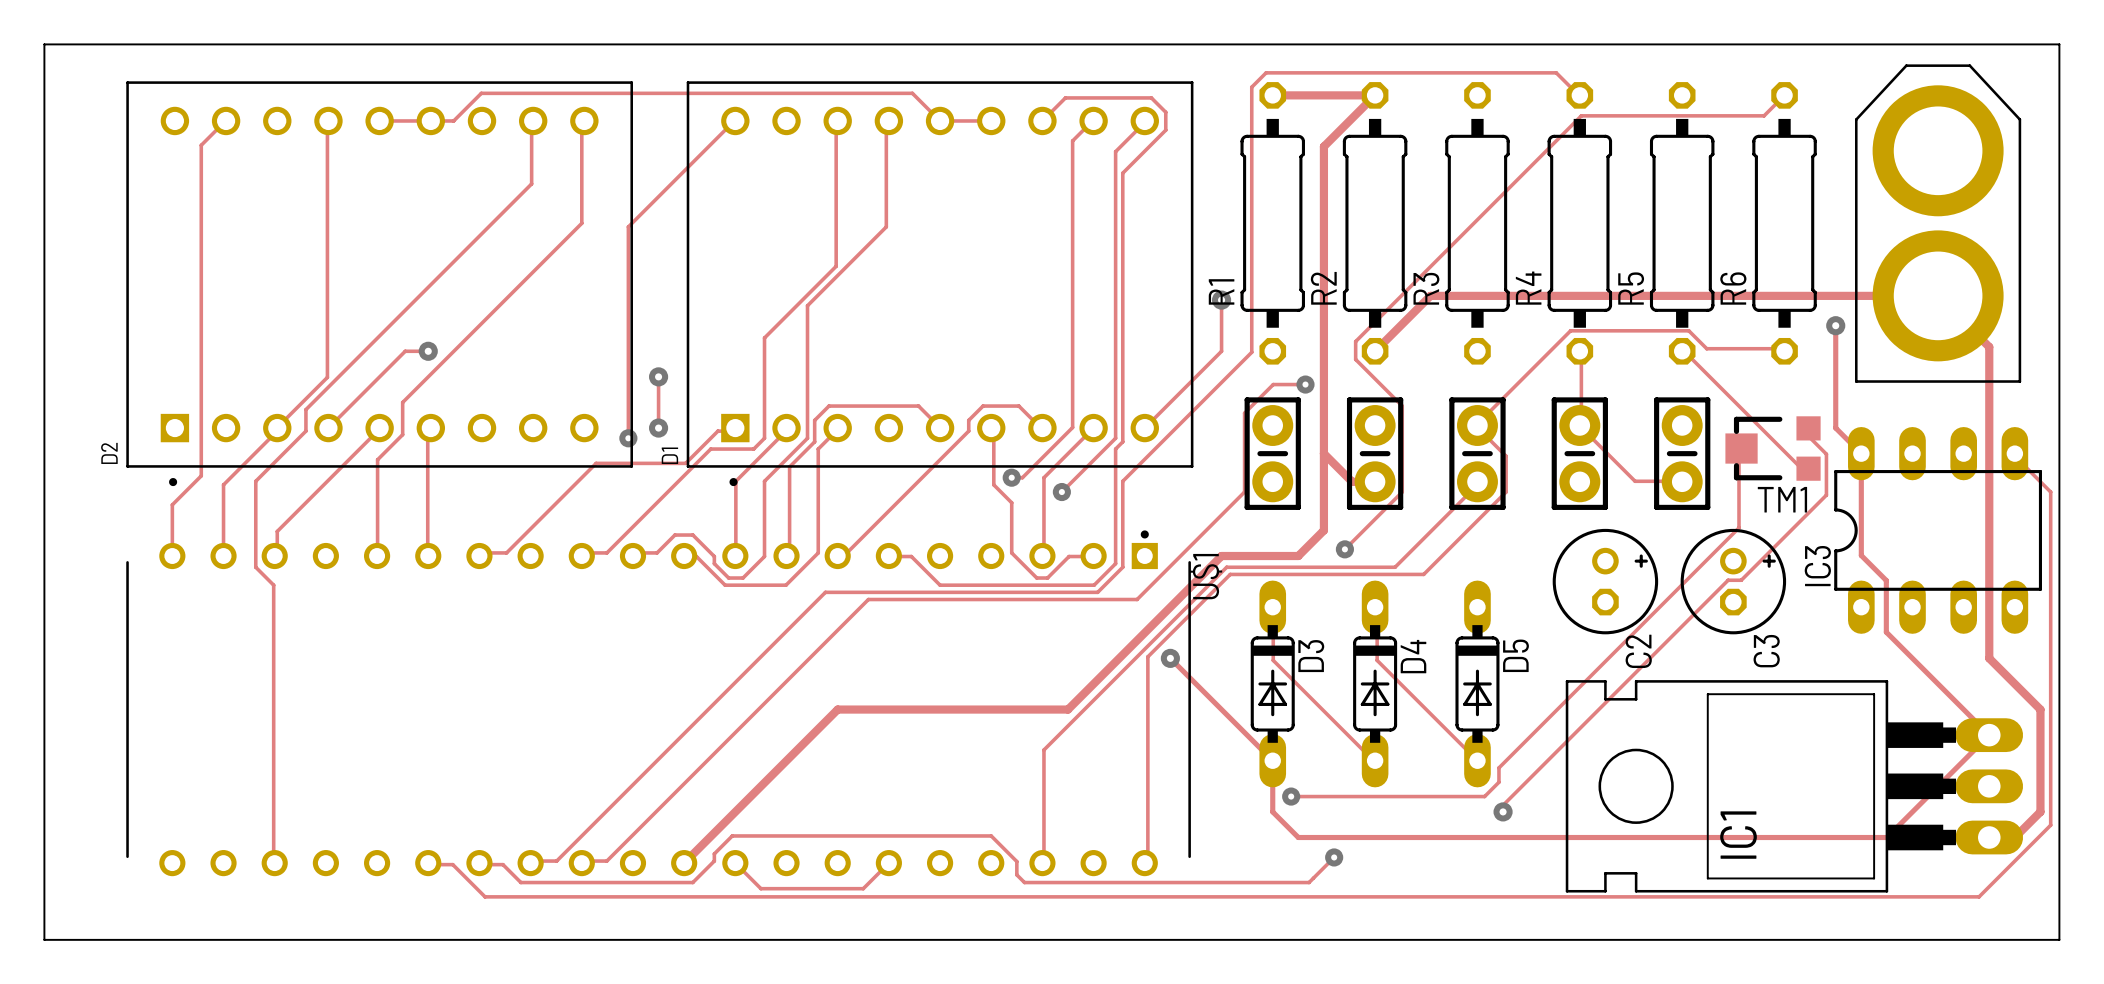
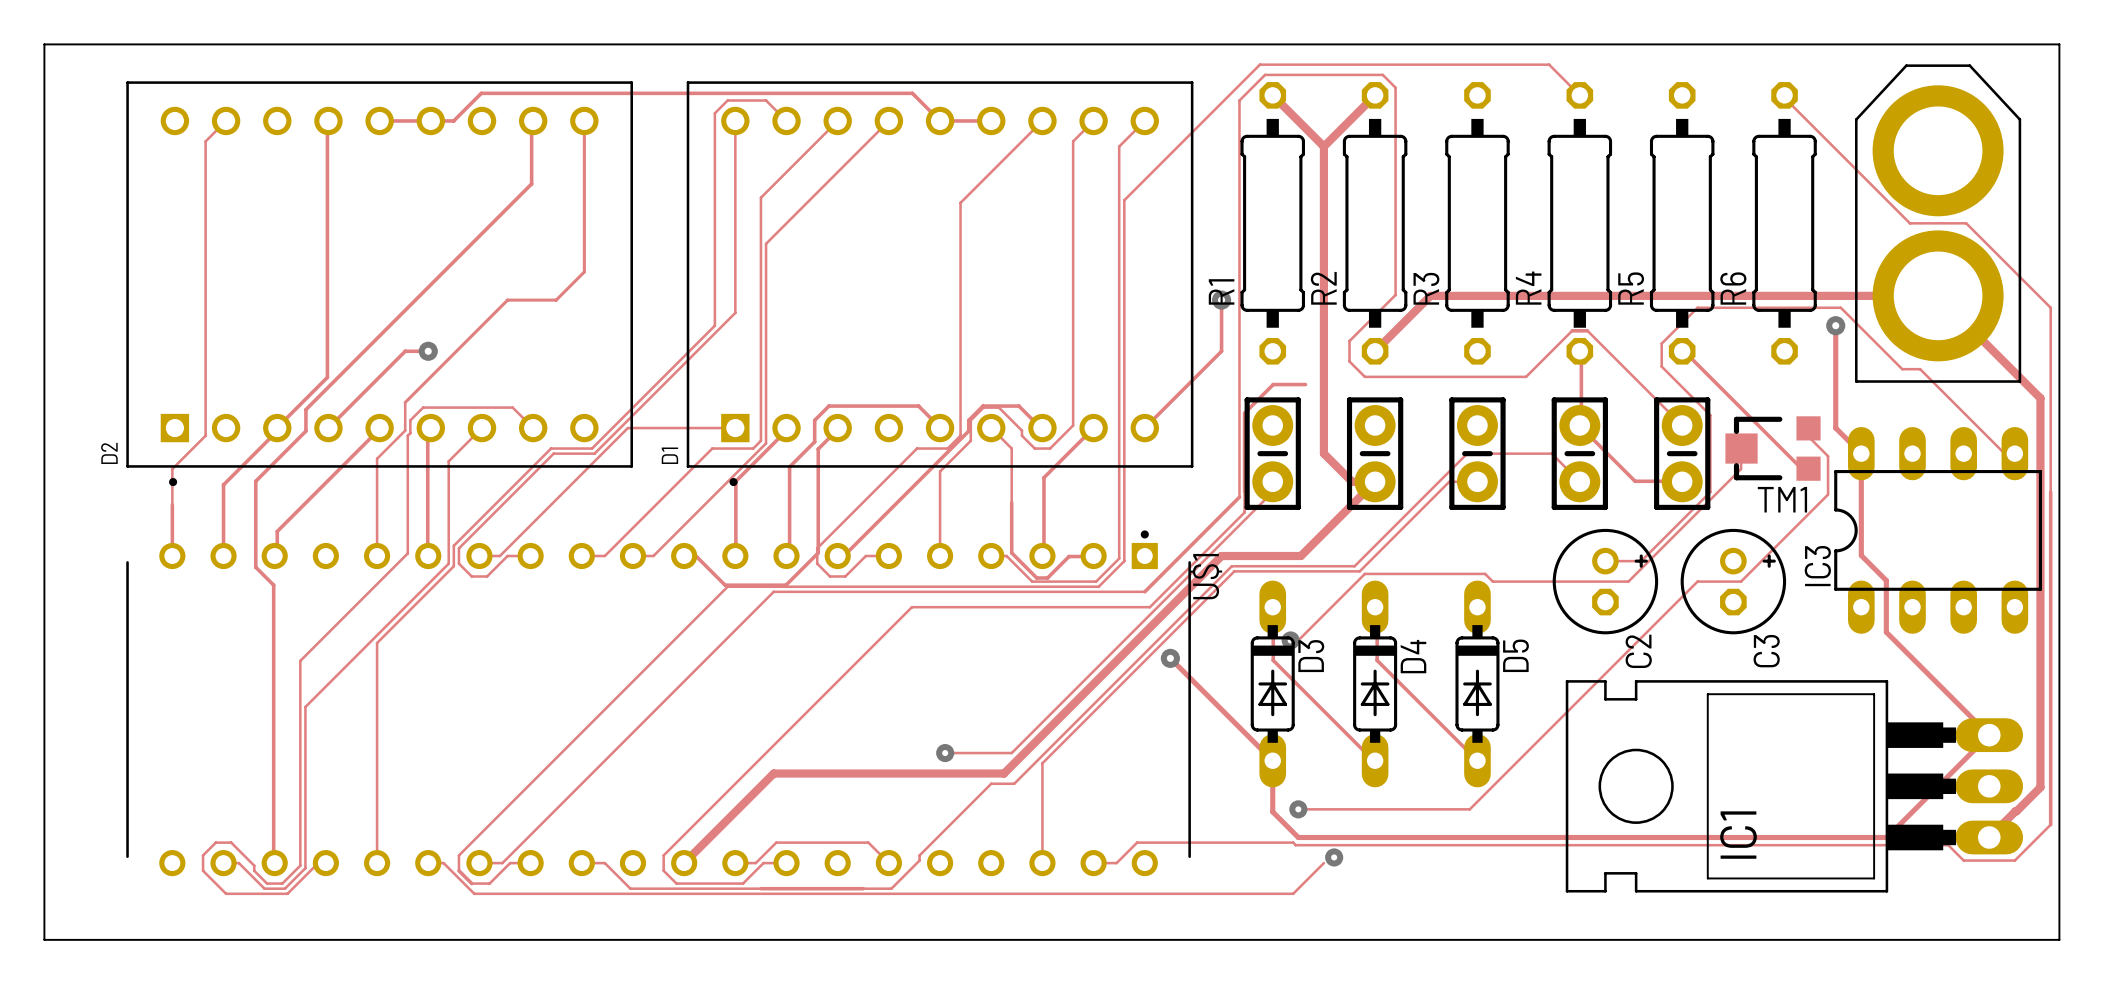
track: (1272, 95) (1375, 95) -> (1272, 95) (1323, 146)
track: (1579, 95) (1556, 72) (1266, 72) (1251, 87) (1251, 352) (1122, 481) (1122, 567) (1097, 592) (825, 592) (556, 861) (531, 861) (530, 863) -> (1579, 95) (1549, 64) (1259, 64) (1124, 200) (1124, 561) (1098, 586) (727, 586) (458, 855) (458, 870)
track: (1784, 95) (1764, 115) (1581, 115) (1355, 341) (1355, 359) (1402, 406) (1402, 492) (1344, 549) -> none
track: (226, 120) (201, 145) (201, 475) (172, 504) -> (226, 120) (205, 141) (205, 435) (172, 469) (172, 504)
track: (584, 120) (581, 123) (581, 223) (402, 402) (402, 434) (377, 459) (377, 556) -> (584, 120) (584, 271) (556, 300) (507, 300) (405, 402) (405, 430) (377, 458) (377, 556)
track: (735, 120) (628, 226) (628, 438) -> (735, 120) (735, 312) (594, 453) (553, 453) (458, 548) (458, 563) (471, 576) (487, 576) (507, 556) (530, 556)
track: none -> (786, 120) (766, 100) (727, 100) (714, 113) (714, 325) (592, 448) (551, 448) (453, 545) (453, 566) (377, 643) (377, 863)
track: (837, 120) (836, 123) (836, 266) (764, 337) (764, 438) (753, 449) (710, 449) (606, 552) (581, 552) (581, 556) -> (837, 120) (760, 197) (760, 440) (753, 448) (712, 448) (604, 556) (581, 556)
track: (888, 120) (886, 123) (886, 226) (807, 305) (807, 438) (764, 481) (764, 556) (743, 578) (728, 578) (714, 563) (714, 556) (692, 535) (674, 535) (657, 552) (635, 552) (632, 556) -> (888, 120) (766, 243) (766, 443) (653, 556) (632, 556)
track: (1042, 120) (1065, 97) (1151, 97) (1165, 112) (1165, 130) (1122, 173) (1122, 441) (1115, 449) (1115, 563) (1094, 585) (940, 585) (911, 556) (888, 556) -> (1042, 120) (960, 202) (960, 435) (947, 448) (917, 448) (817, 548) (817, 563) (830, 576) (845, 576) (865, 556) (888, 556)
track: (1093, 120) (1072, 140) (1072, 427) (1022, 477) (1011, 477) -> (1093, 120) (1073, 141) (1073, 425) (1050, 448) (1034, 448) (1021, 435) (1021, 430) (998, 407) (983, 407) (970, 420) (970, 440) (940, 471) (940, 556)
track: (1144, 120) (1115, 151) (1115, 438) (1061, 492) -> (1144, 120) (1119, 146) (1119, 558) (1096, 581) (1032, 581) (1006, 556) (991, 556)
track: (1572, 330) (1477, 423) (1477, 427) (1506, 456) (1506, 492) (1423, 574) (1230, 574) (1147, 656) (1147, 861) (1144, 863) -> none
track: (1587, 330) (1688, 330) (1706, 348) (1781, 348) (1784, 351) -> (1587, 330) (1682, 425)
track: (1989, 347) (1989, 658) (2040, 709) -> (1989, 347) (2040, 398) (2040, 709)
track: (658, 376) (658, 428) -> none
via: (658, 376) -> none
via: (1305, 384) -> none
track: none -> (482, 428) (448, 461) (448, 563) (305, 706) (305, 868) (284, 888) (264, 888) (238, 863) (223, 863)
track: none -> (533, 428) (512, 407) (423, 407) (410, 420) (410, 433) (407, 435) (407, 553) (300, 660) (300, 865) (282, 883) (267, 883) (254, 870) (254, 865) (231, 842) (215, 842) (203, 855) (203, 870) (226, 893) (287, 893) (318, 863) (325, 863)
via: (658, 428) -> none
track: (735, 428) (732, 431) (717, 431) (685, 463) (596, 463) (506, 552) (481, 552) (479, 556) -> (735, 428) (627, 428) (499, 556) (479, 556)
track: (991, 428) (993, 431) (993, 484) (1011, 502) -> (991, 428) (1011, 448) (1011, 502)
track: (1808, 428) (1808, 436) (1826, 454) (1826, 495) (1741, 580) (1728, 580) (1503, 805) (1503, 811) -> (1808, 428) (1810, 438) (1828, 456) (1828, 494) (1741, 581) (1697, 581) (1469, 809) (1298, 809)
via: (628, 438) -> none
track: (1741, 448) (1739, 449) (1739, 527) (1498, 767) (1498, 782) (1484, 796) (1291, 796) -> (1741, 448) (1741, 469) (1628, 581) (1492, 581) (1485, 573) (1364, 573) (1298, 640) (1290, 640)
track: (1323, 453) (1323, 530) (1298, 556) -> (1375, 481) (1300, 556) (1298, 556)
track: (2014, 453) (2014, 456) (2050, 492) -> (1784, 95) (1784, 97) (1909, 223) (1966, 223) (2050, 307) (2050, 492)
track: none -> (2014, 453) (2004, 453) (1920, 369) (1902, 369) (1840, 307) (1697, 307) (1661, 343) (1661, 366) (1710, 415) (1710, 492) (1641, 561) (1605, 561)
via: (1011, 477) -> none
track: none -> (1272, 481) (1272, 492) (1011, 753) (945, 753)
track: (1477, 481) (1477, 484) (1395, 567) (1226, 567) (1043, 749) (1043, 861) (1042, 863) -> (1477, 481) (1449, 481) (1359, 571) (1234, 571) (1042, 763) (1042, 863)
via: (1061, 492) -> none
track: (1244, 492) (1239, 497) -> (1572, 330) (1526, 376) (1364, 376) (1349, 361) (1349, 341) (1395, 294) (1395, 87) (1382, 74) (1265, 74) (1239, 100) (1239, 497)
track: none -> (1244, 492) (1244, 512) (1149, 607) (911, 607) (663, 855) (663, 870) (676, 883) (743, 883) (763, 863) (786, 863)
via: (1344, 549) -> none
track: (1144, 591) (1137, 599) (868, 599) (606, 861) (581, 861) (581, 863) -> (1144, 591) (773, 591) (502, 863) (479, 863)
via: none -> (1290, 640)
track: (1068, 709) (837, 709) (773, 773) -> (1068, 709) (1004, 773) (773, 773)
via: none -> (945, 753)
track: (2040, 787) (2040, 811) (2014, 837) (1989, 837) -> (2040, 787) (1989, 837)
via position: (1291, 796) -> (1298, 809)
via: (1503, 811) -> none
track: (2050, 824) (1979, 896) (485, 896) (471, 883) -> (2050, 824) (2014, 860) (1963, 860) (1948, 845) (1295, 845) (1293, 842) (1137, 842) (1116, 863) (1093, 863)
track: (1334, 857) (1309, 882) (1024, 882) (1016, 874) (1016, 861) (991, 835) (732, 835) (714, 853) (714, 861) (692, 882) (520, 882) (502, 864) (479, 863) -> none
track: (428, 863) (452, 864) (458, 870) -> (428, 863) (443, 863) (474, 893) (1293, 893) (1323, 863)
track: none -> (530, 863) (510, 863) (489, 883) (471, 883)
track: none -> (581, 863) (604, 863) (630, 888) (760, 888)
track: (735, 863) (760, 888) -> (735, 863) (755, 863) (776, 842) (868, 842) (888, 863)
track: (888, 863) (863, 888) -> (1579, 481) (1551, 453) (1467, 453) (1354, 566) (1231, 566) (1014, 783) (991, 783) (919, 855) (919, 860) (891, 888) (863, 888)

